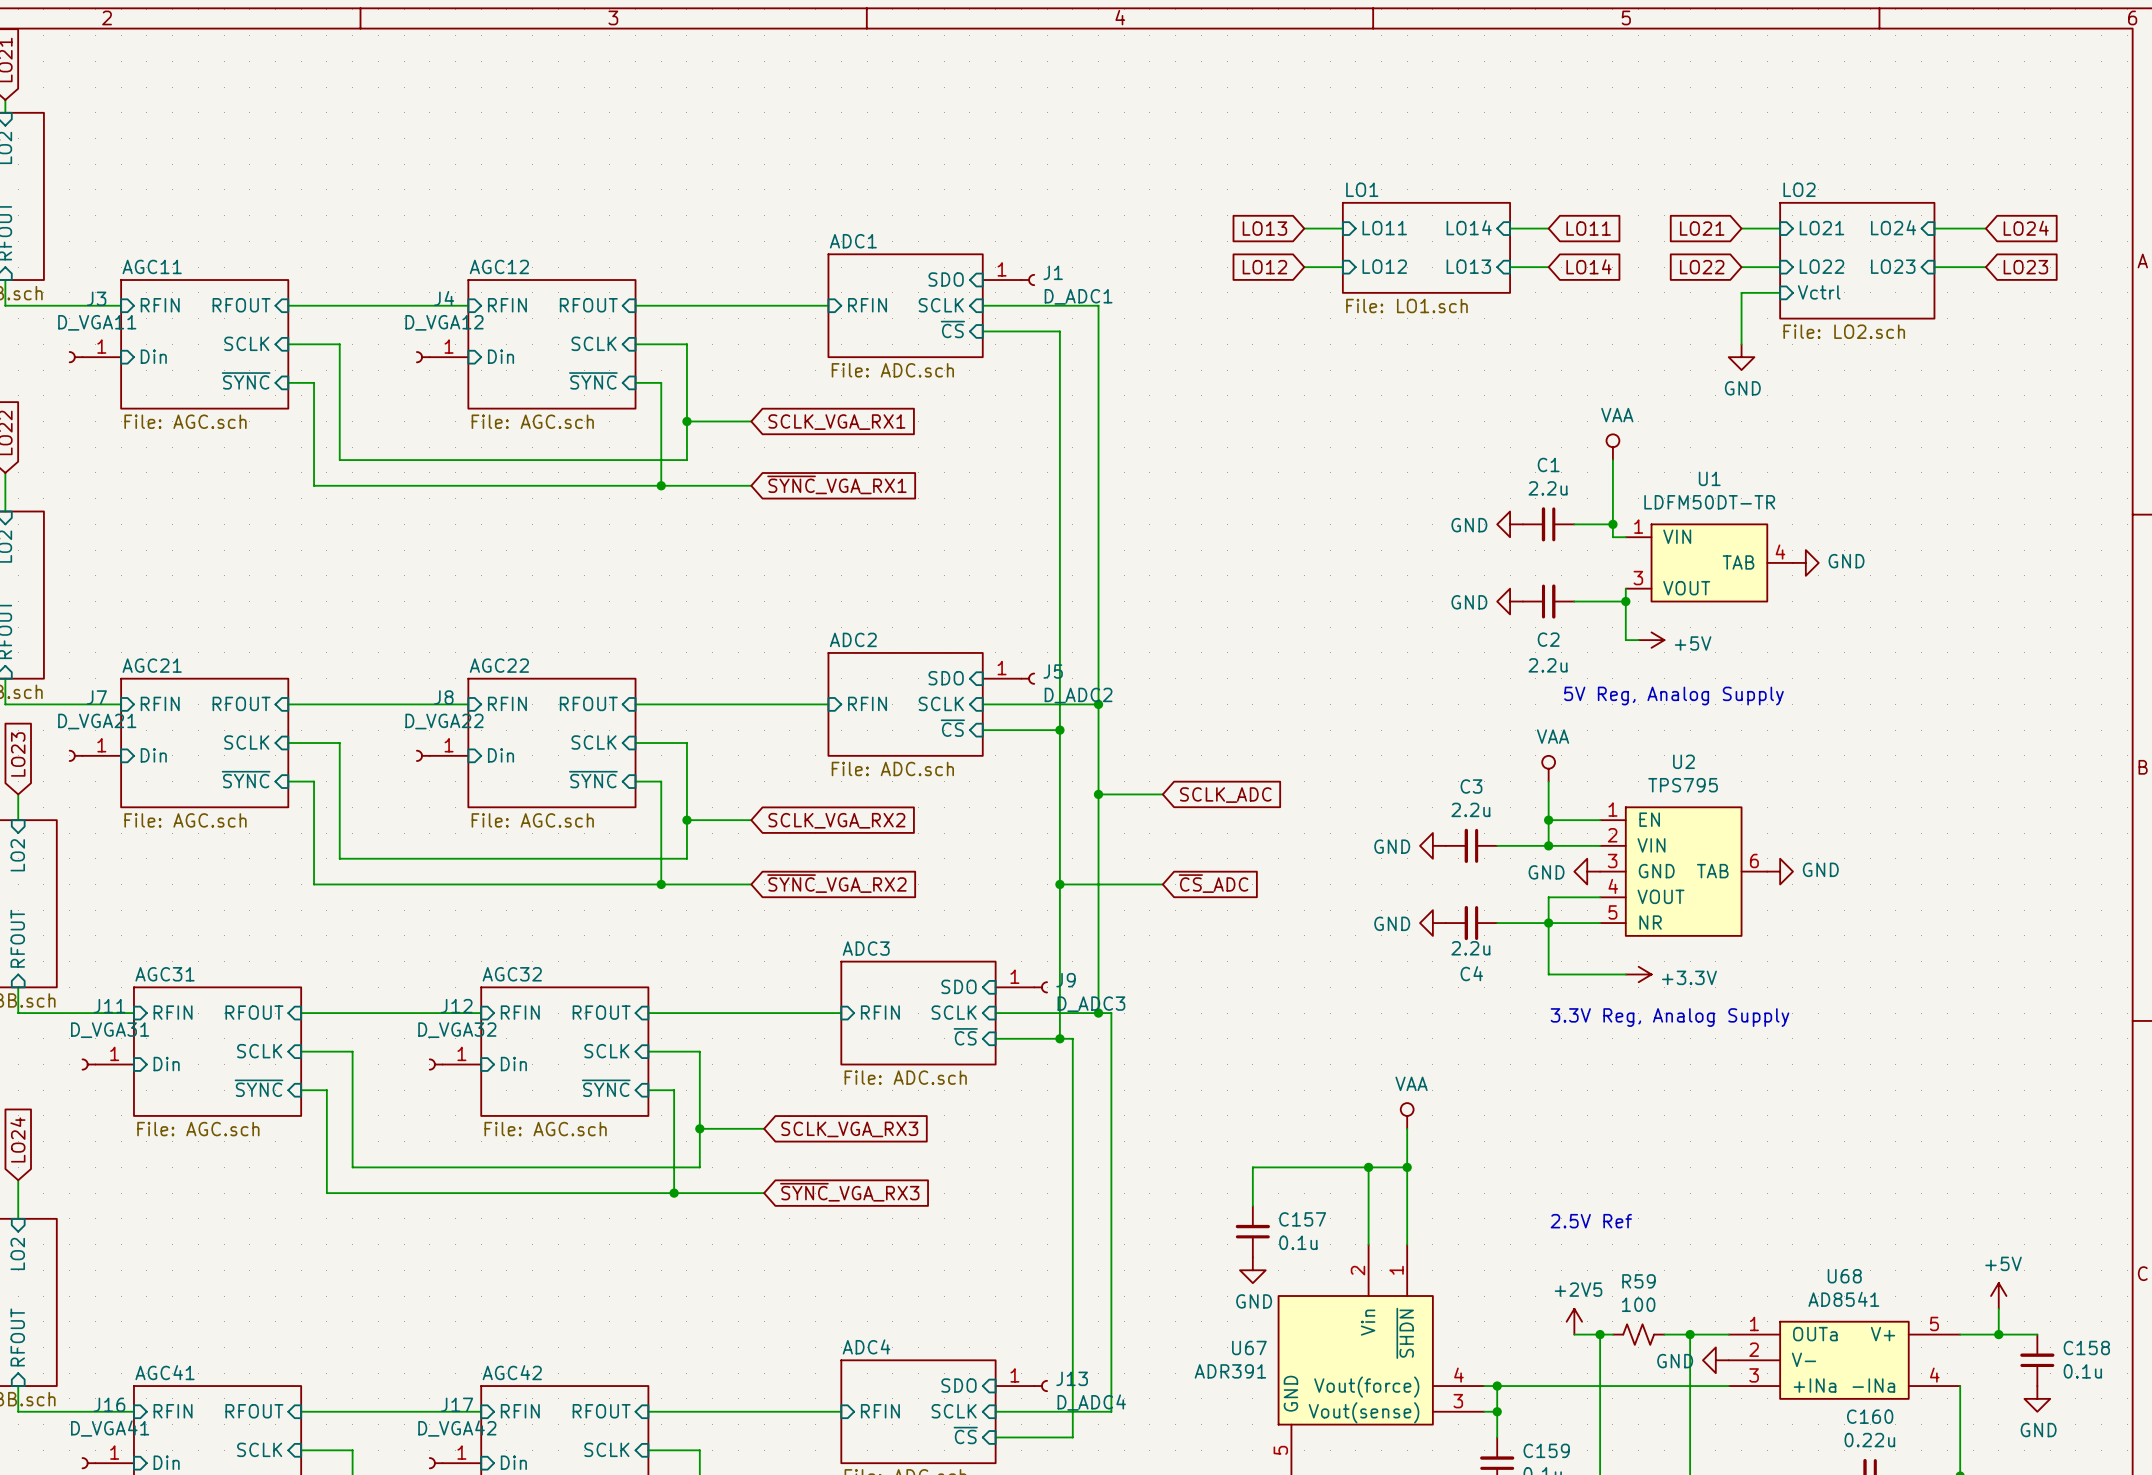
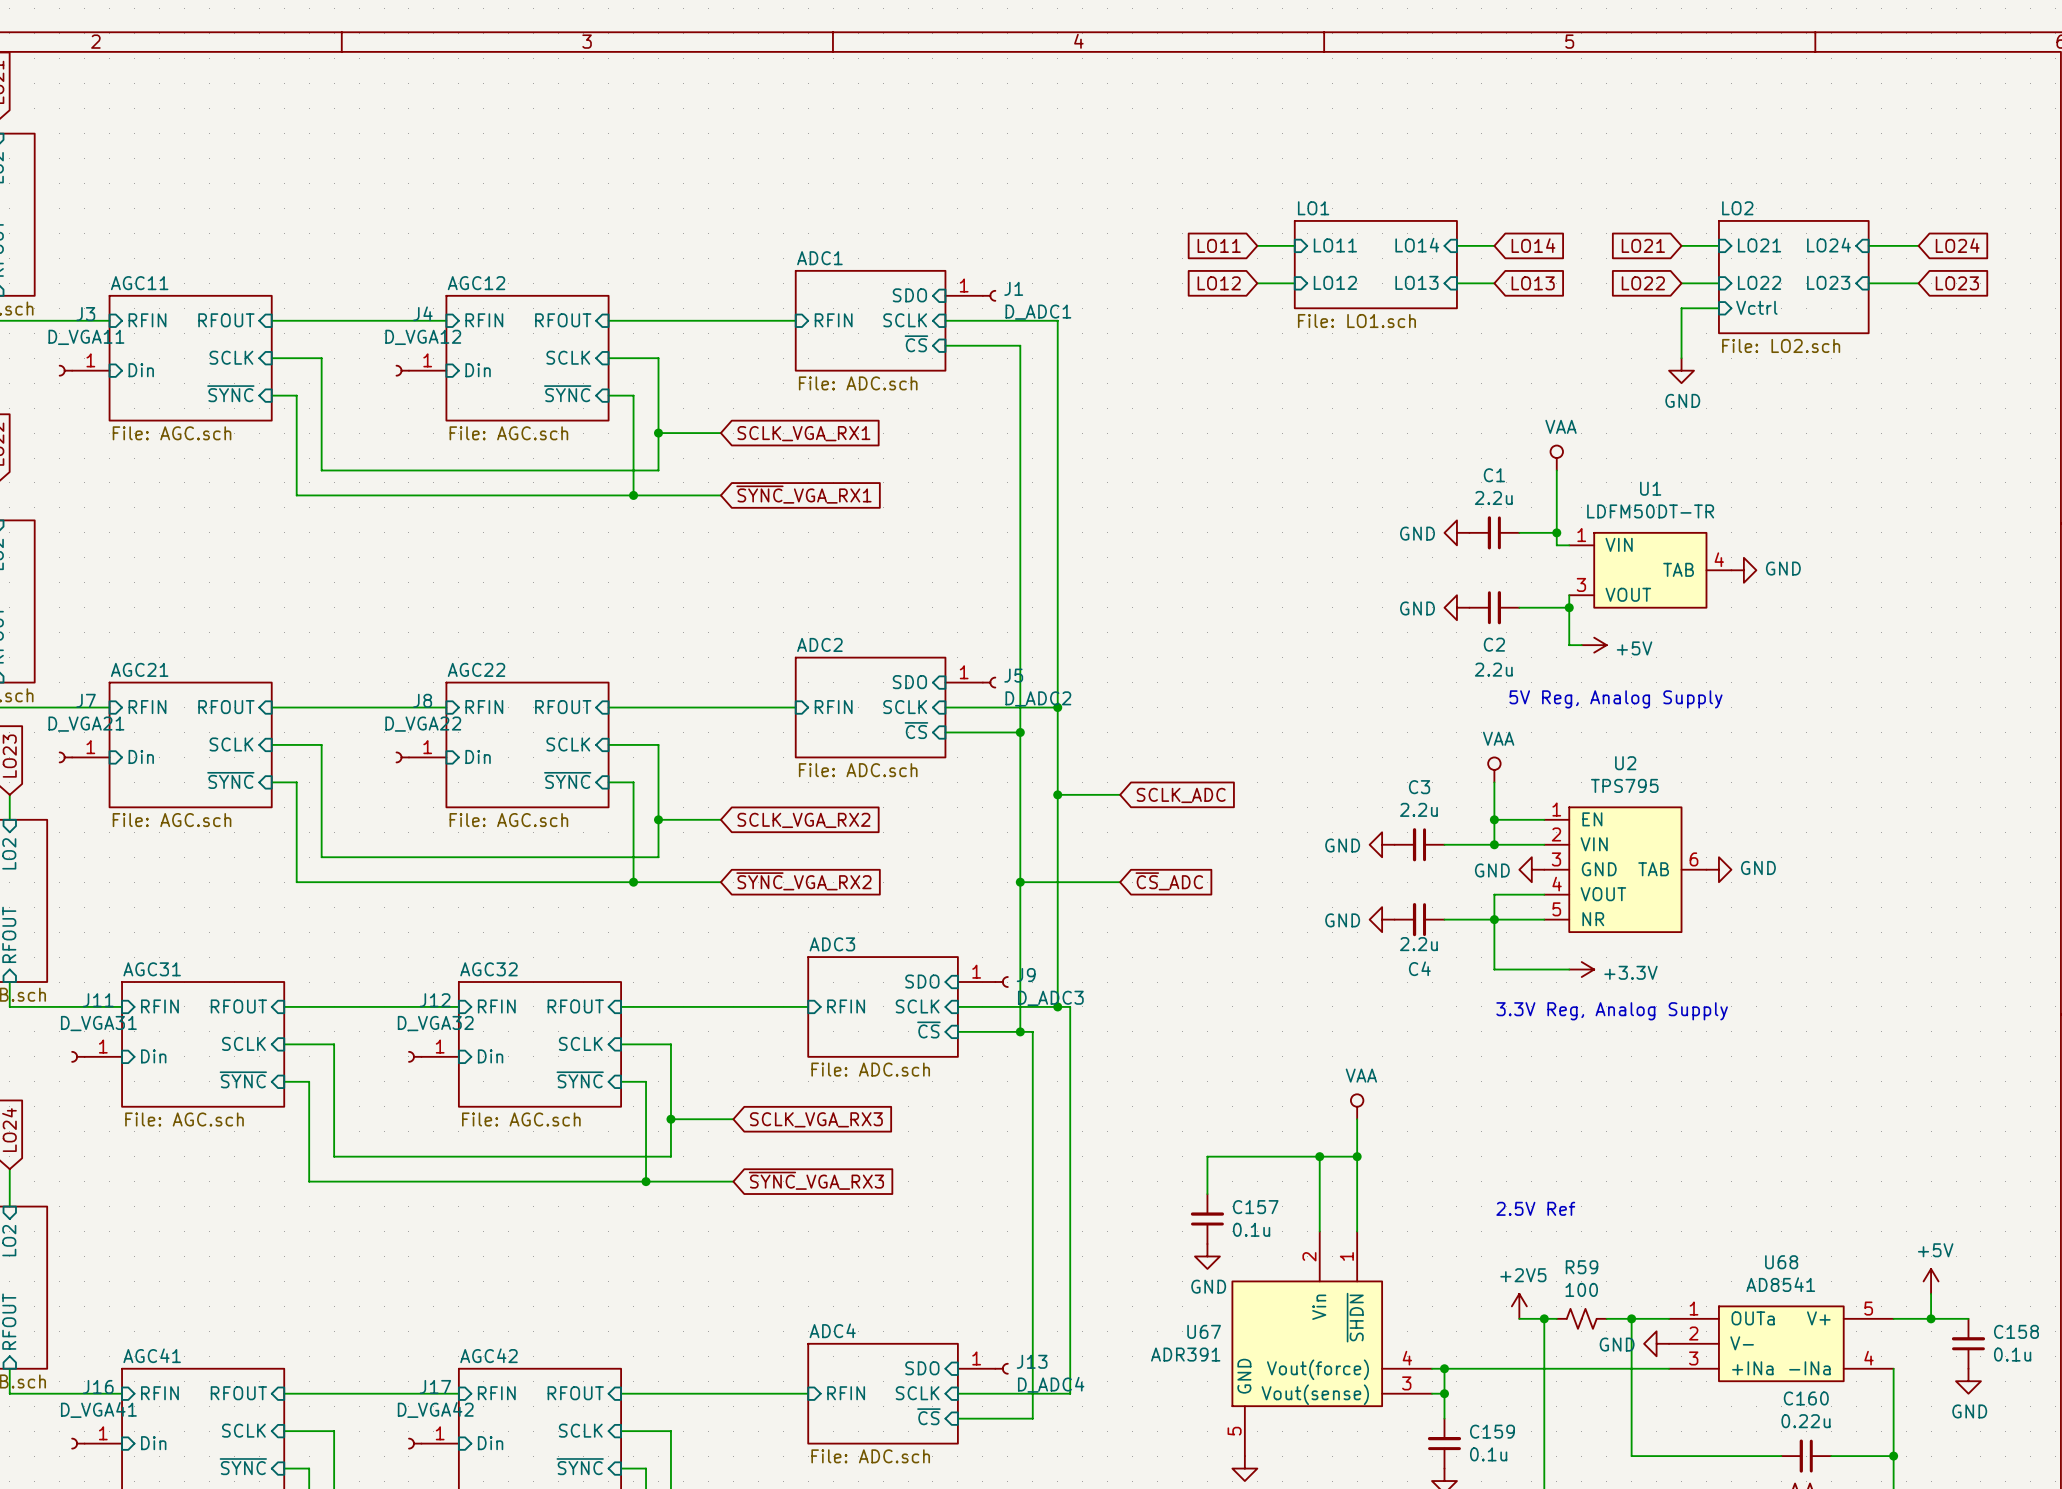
global label: LO13 (1264, 228) -> LO11 (1219, 245)
global label: LO11 (1588, 228) -> LO14 (1533, 245)
global label: LO14 (1588, 266) -> LO13 (1533, 283)

